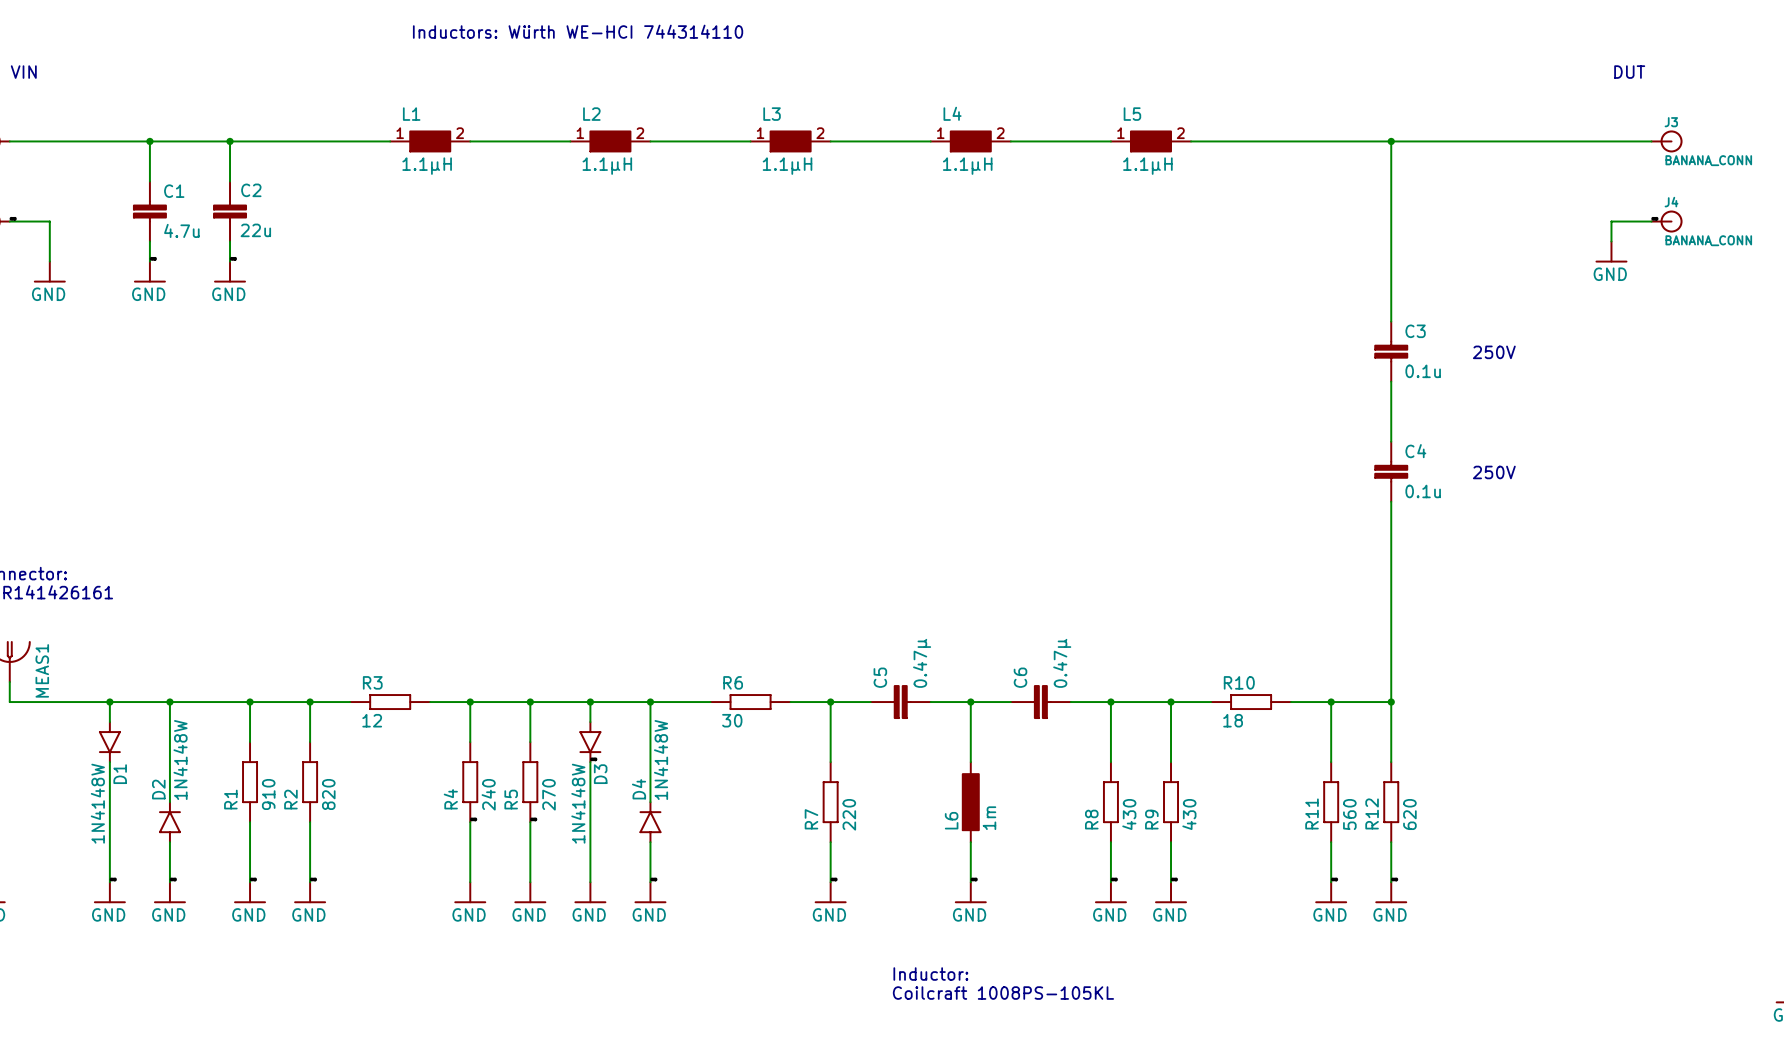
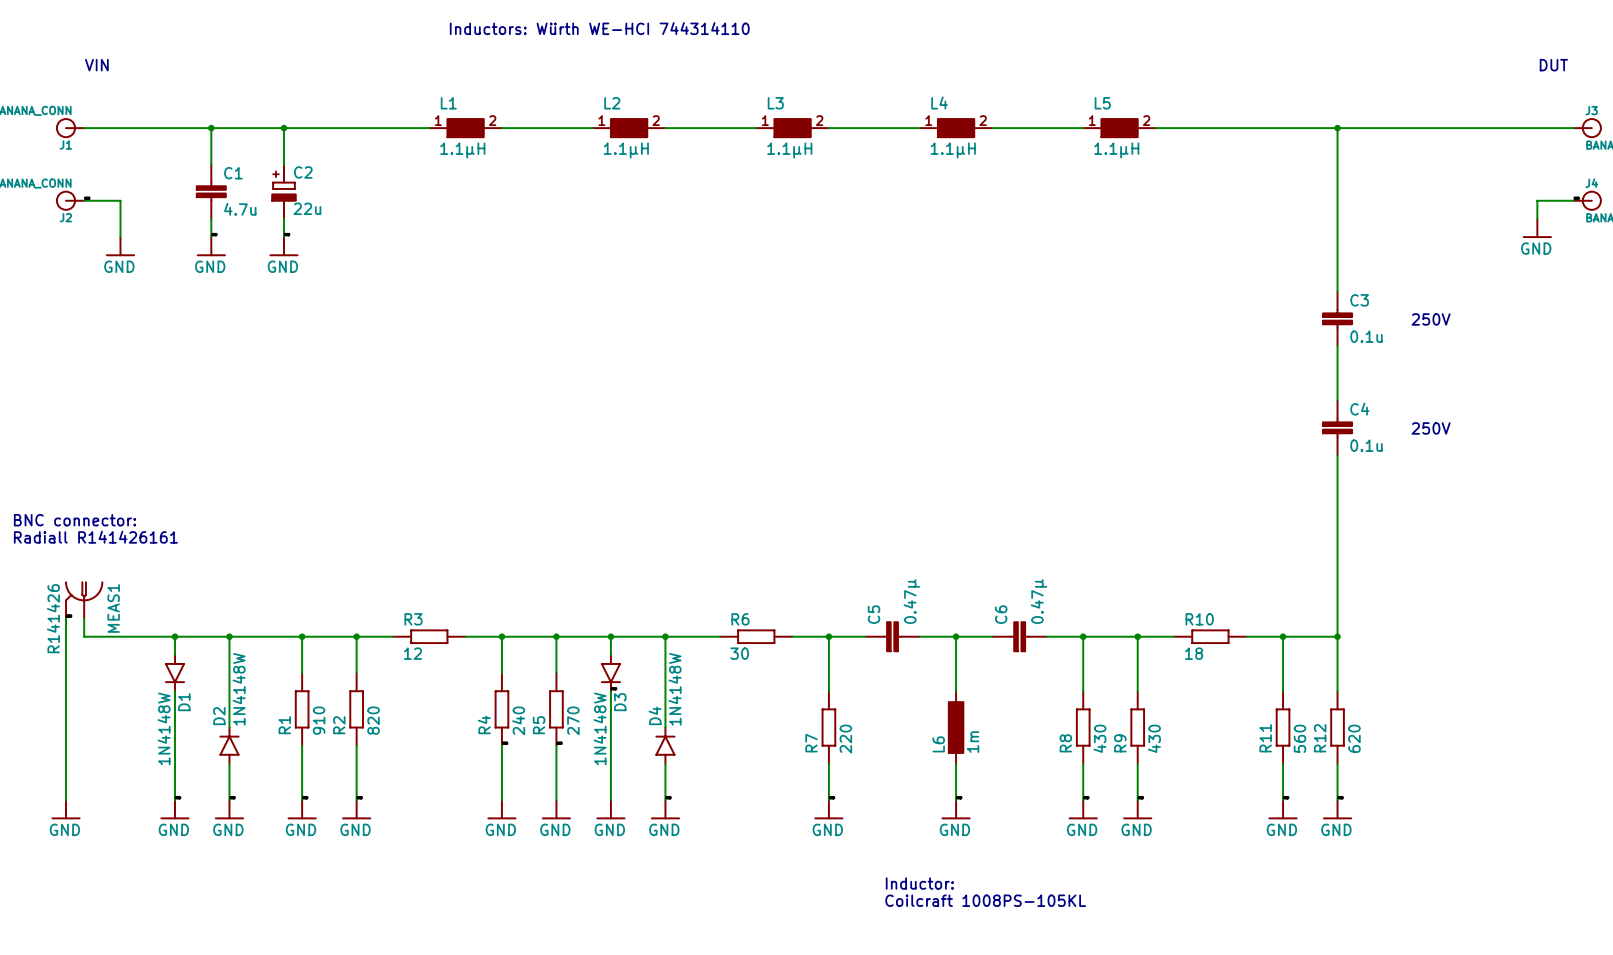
C2 symbol: [213, 181, 247, 242] -> [272, 164, 296, 219]

